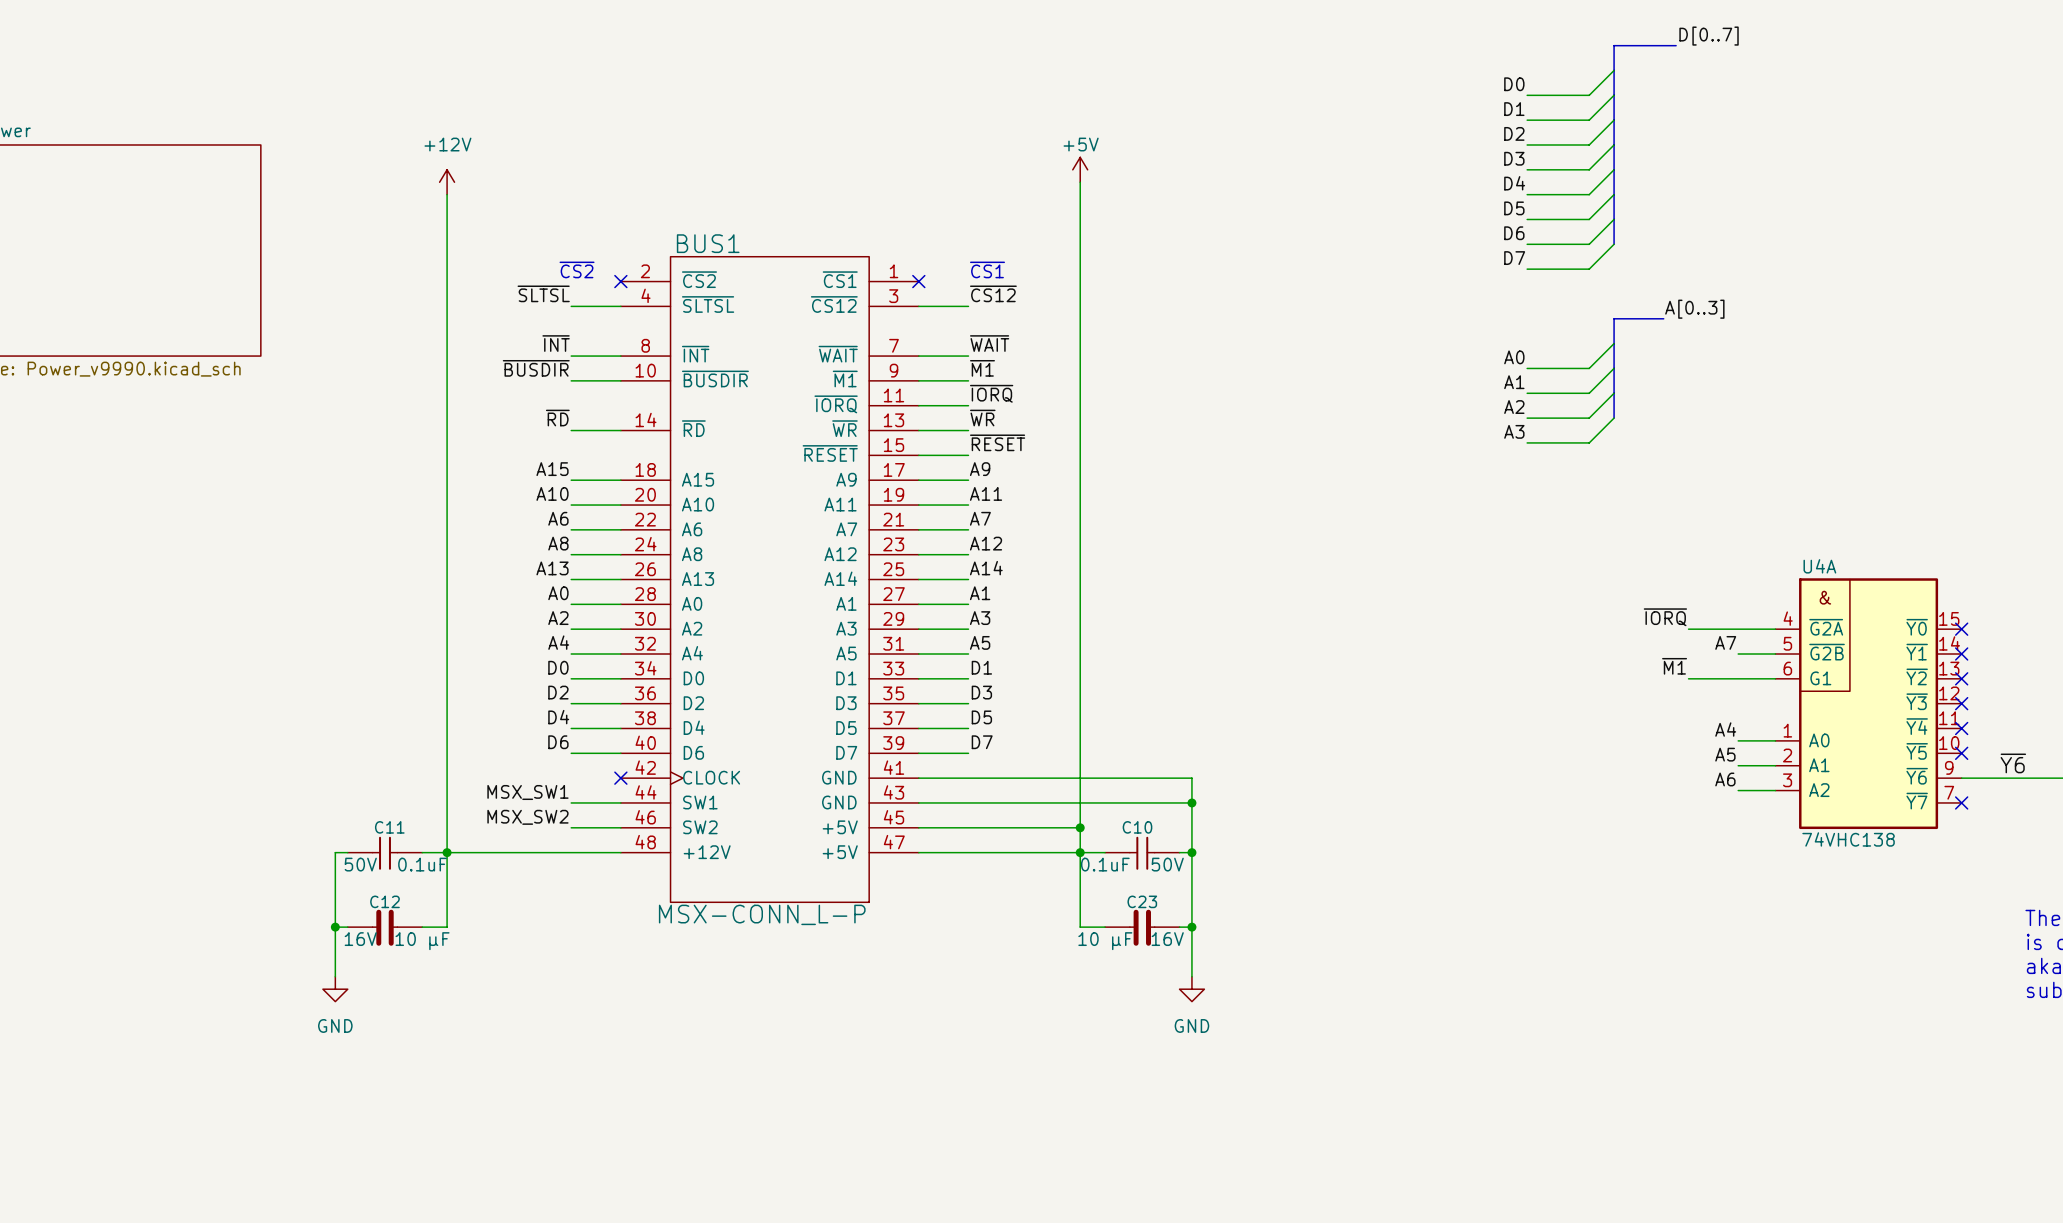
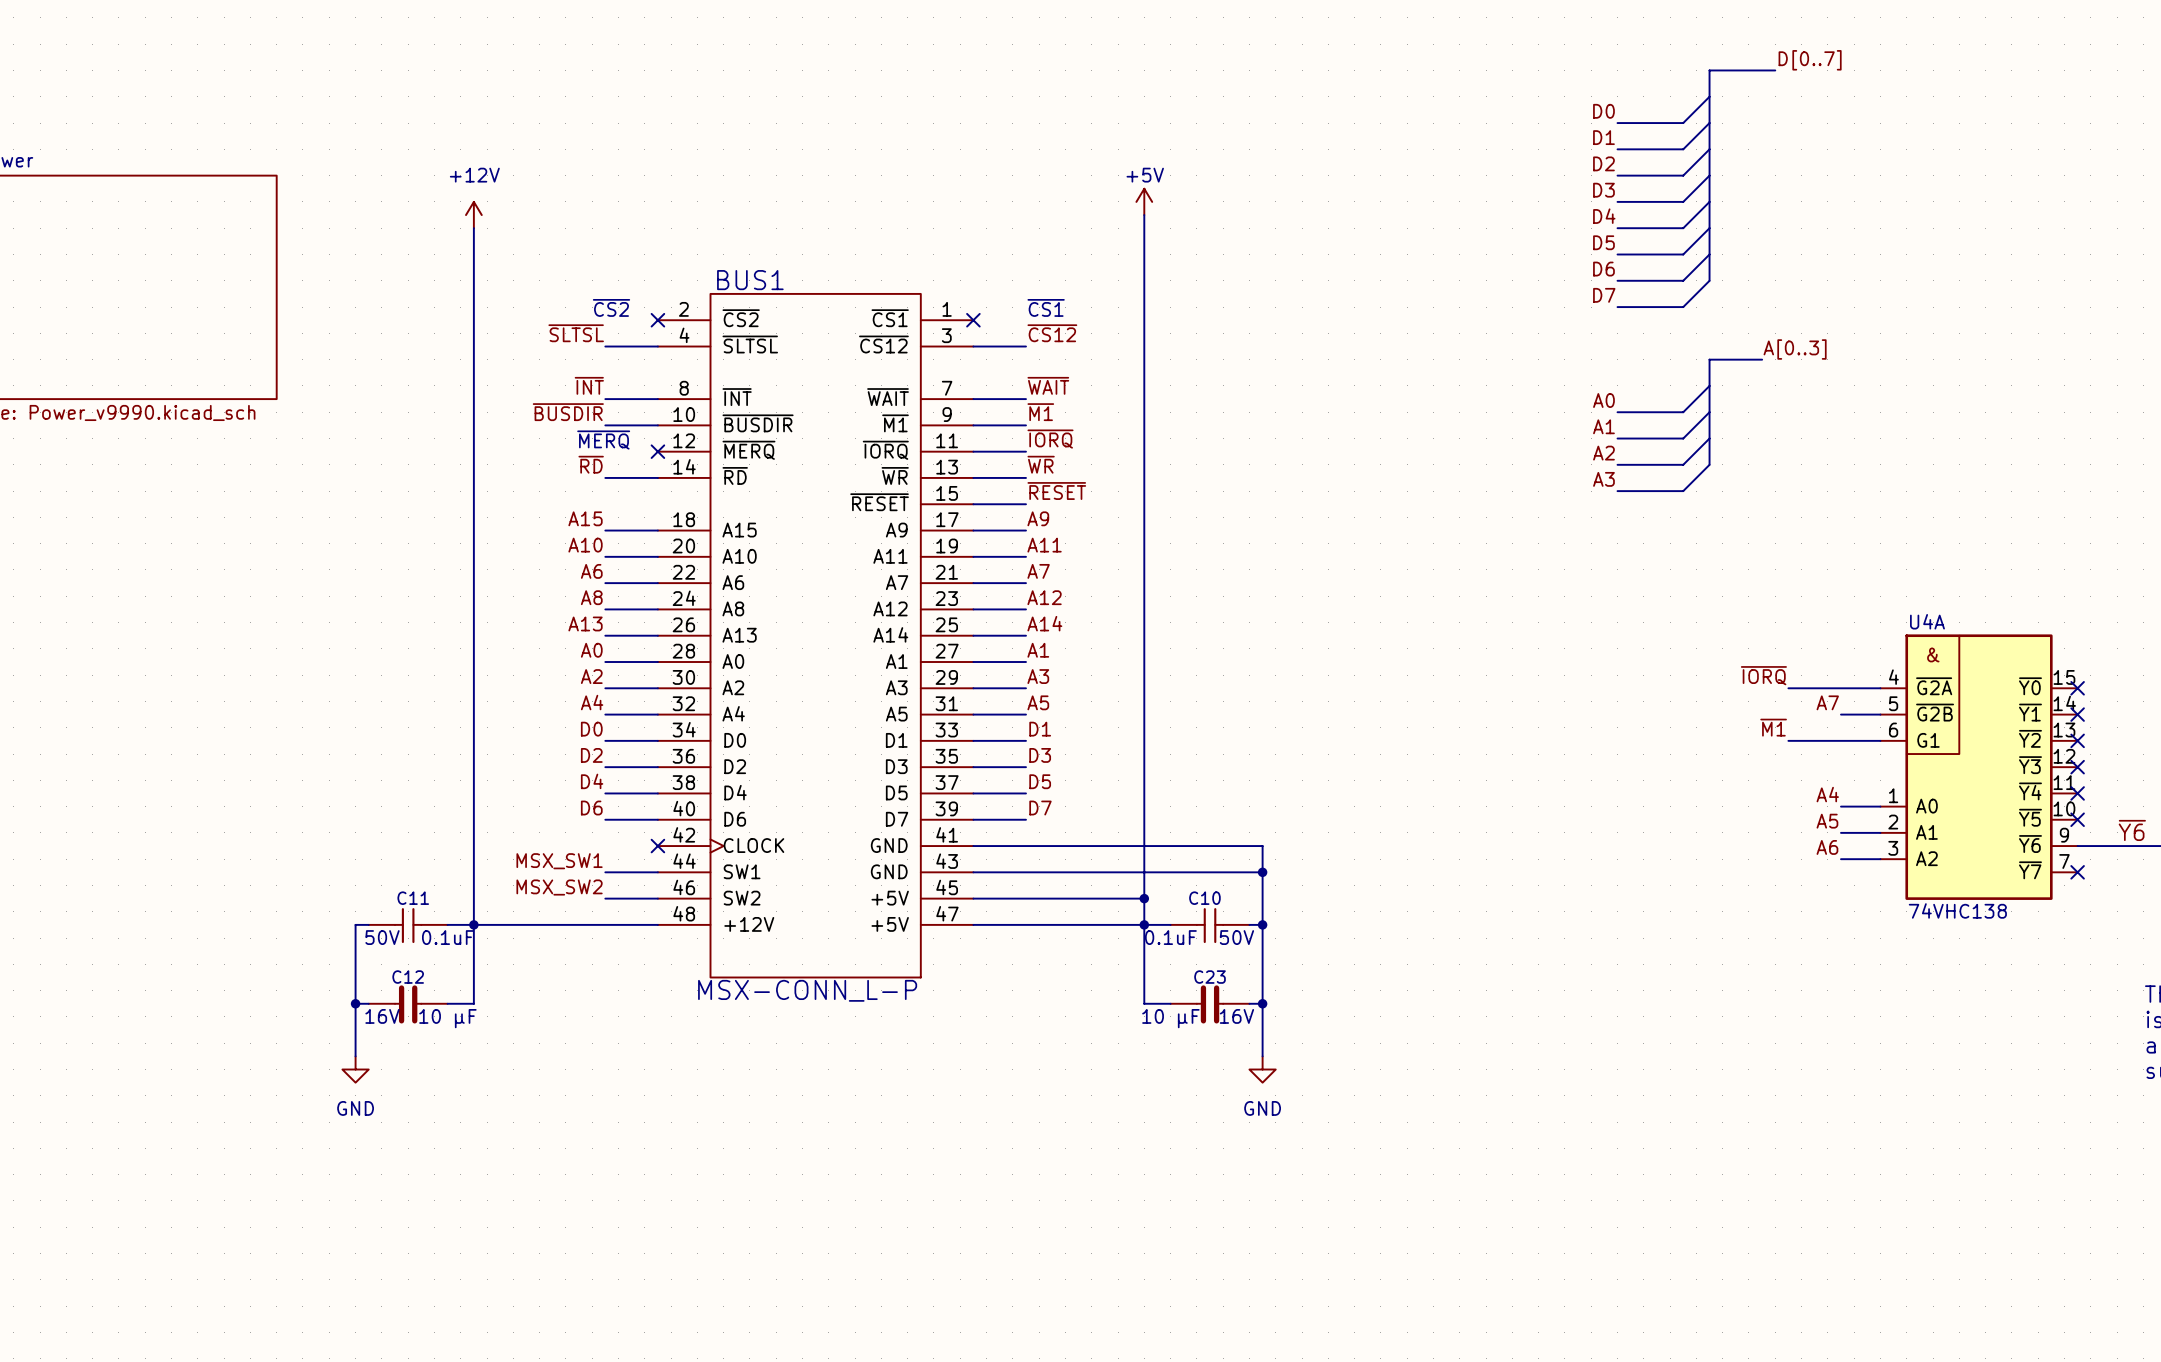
BUS1 symbol: [620, 256, 919, 903] -> [657, 293, 974, 978]
text: none -> ~{MERQ} (603, 440)
no-connect mark: none -> (657, 451)

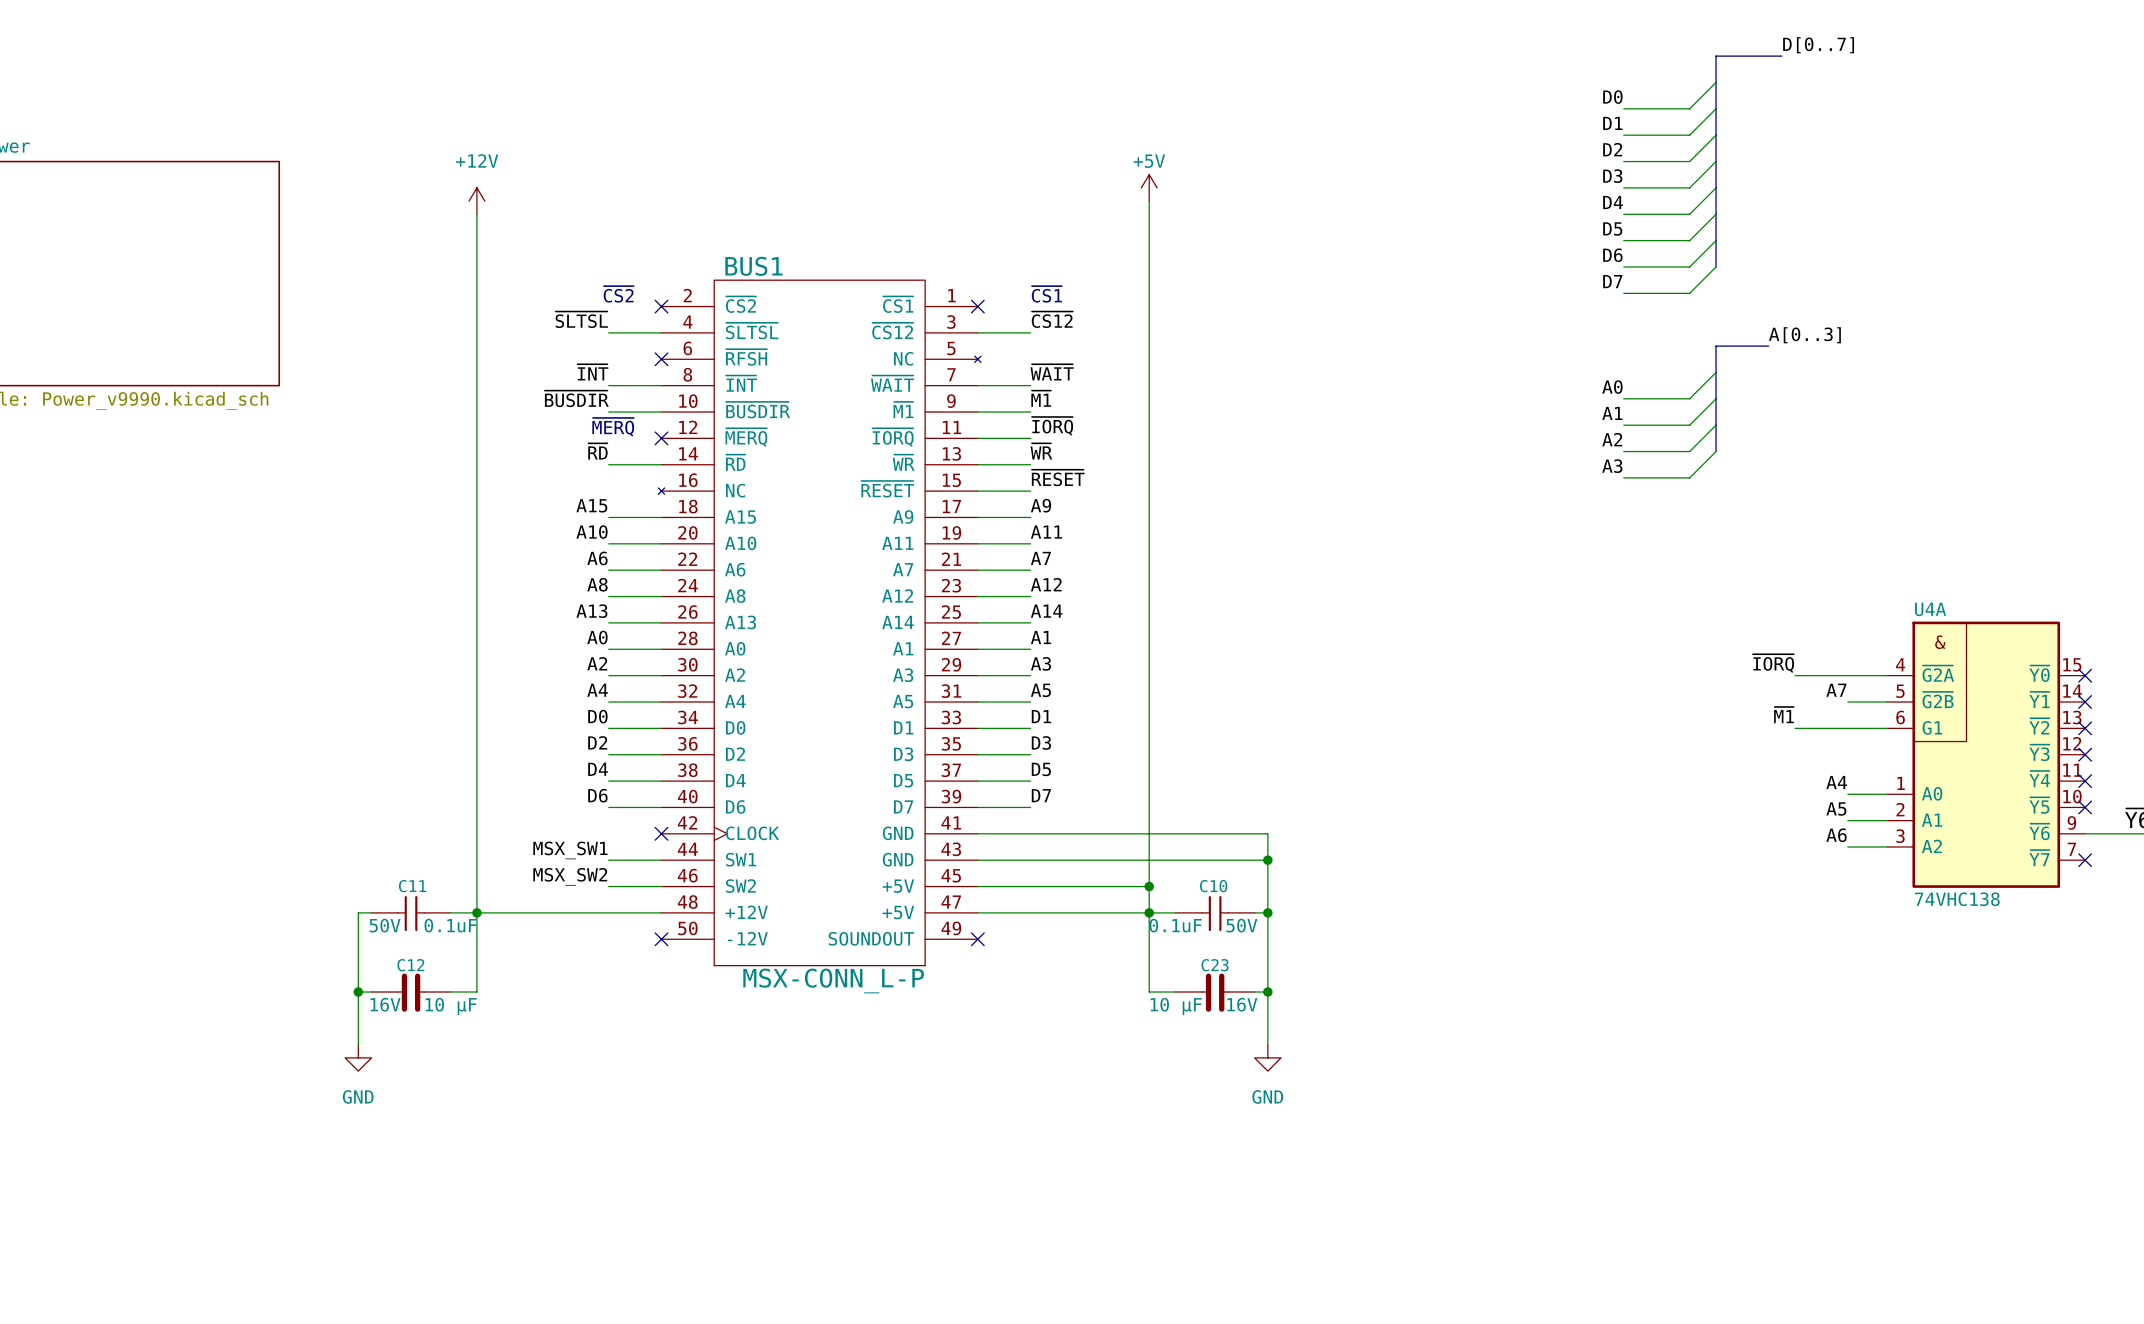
BUS1 symbol: [657, 293, 974, 978] -> [658, 280, 981, 966]
no-connect mark: none -> (661, 359)
no-connect mark: none -> (661, 939)
no-connect mark: none -> (977, 939)

